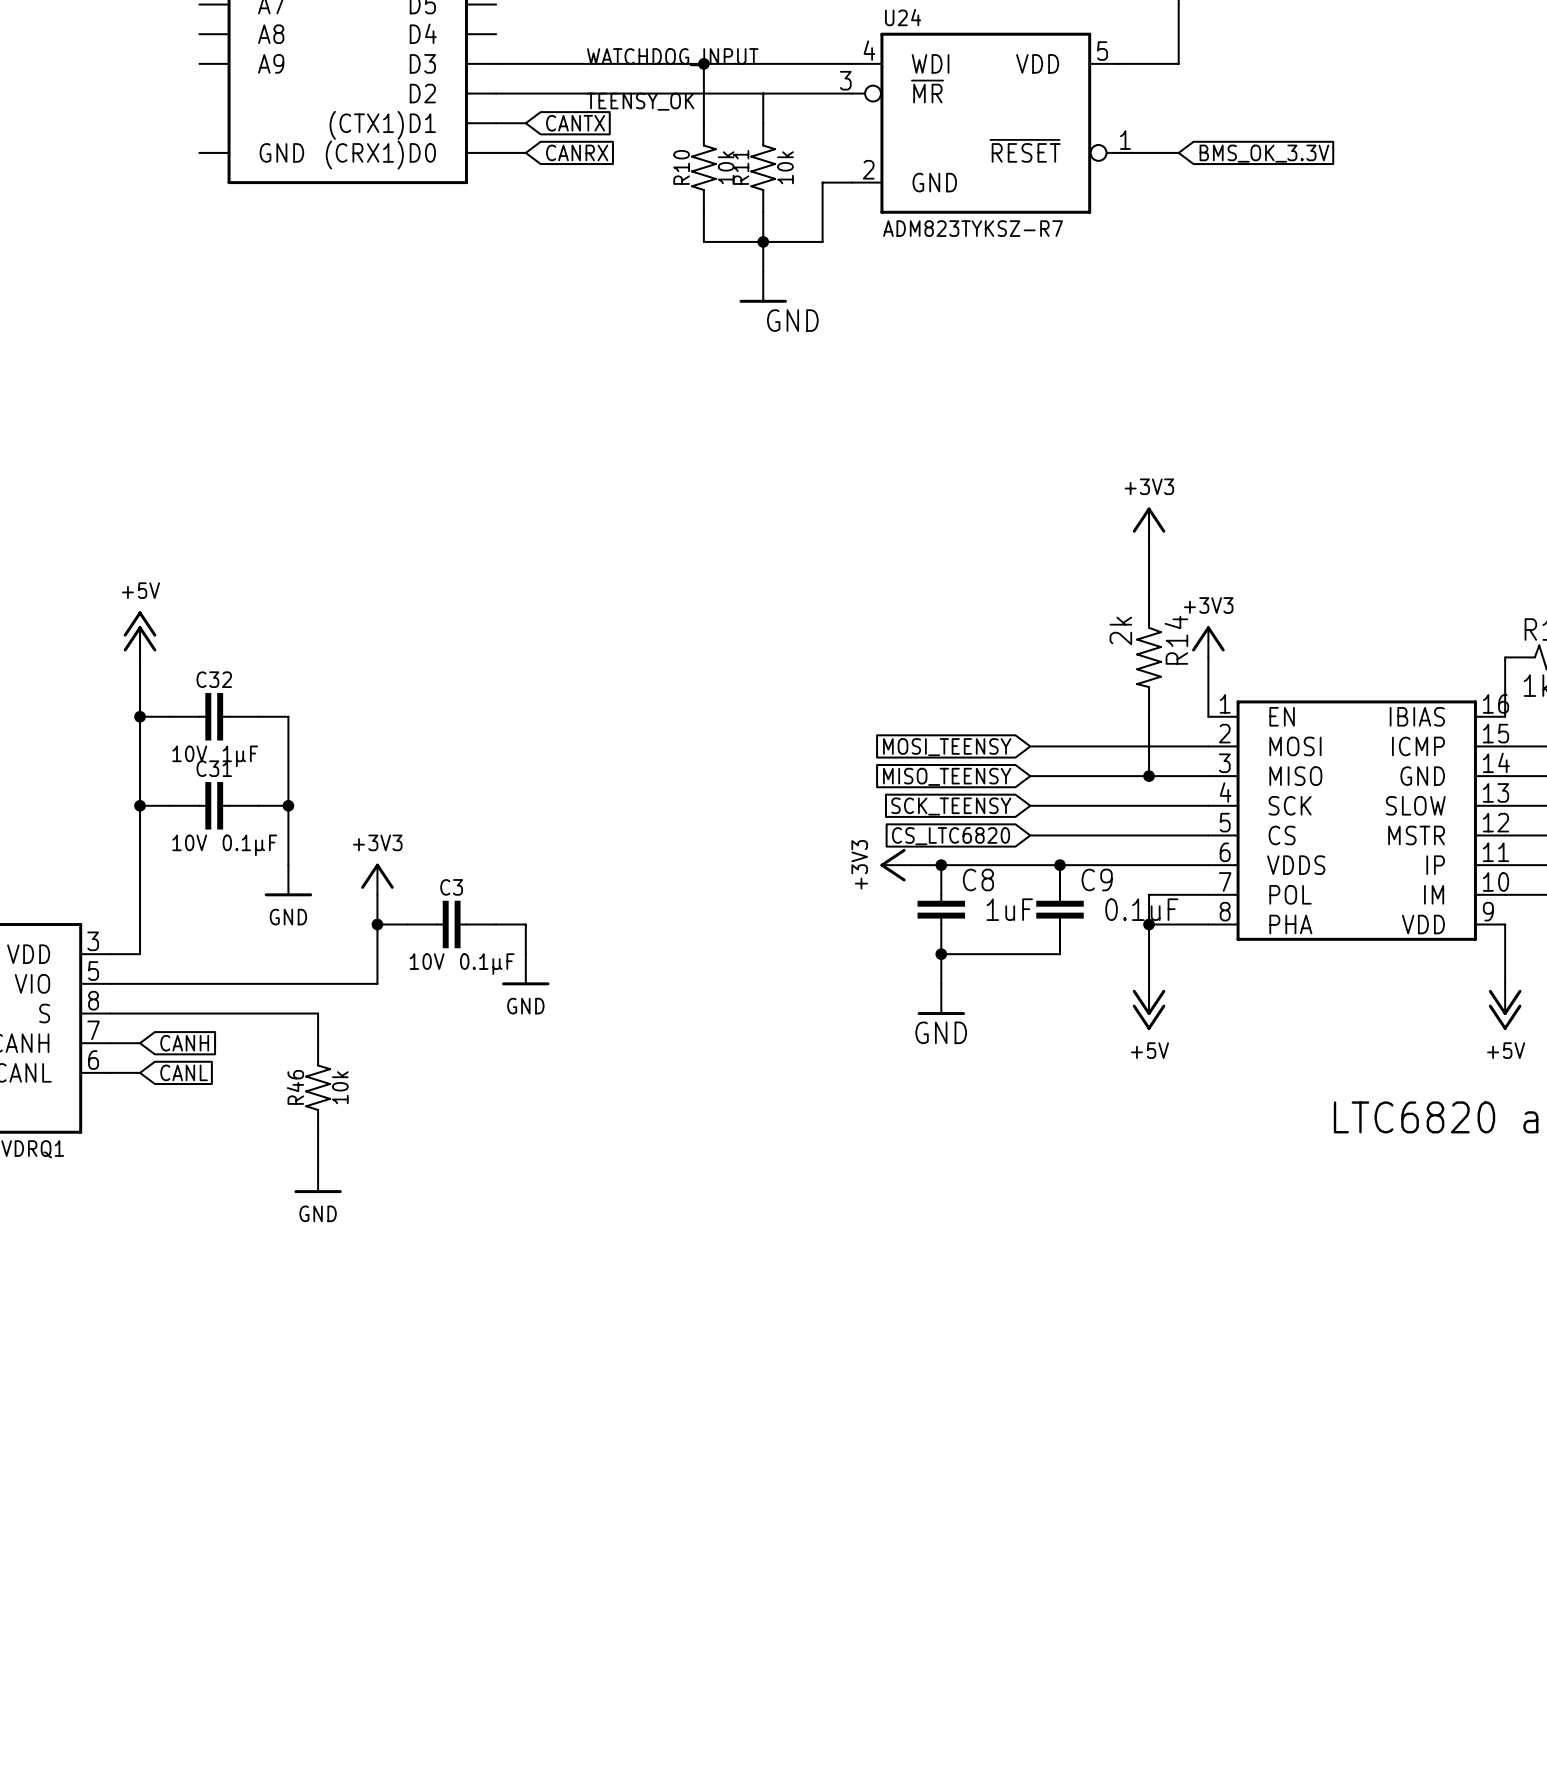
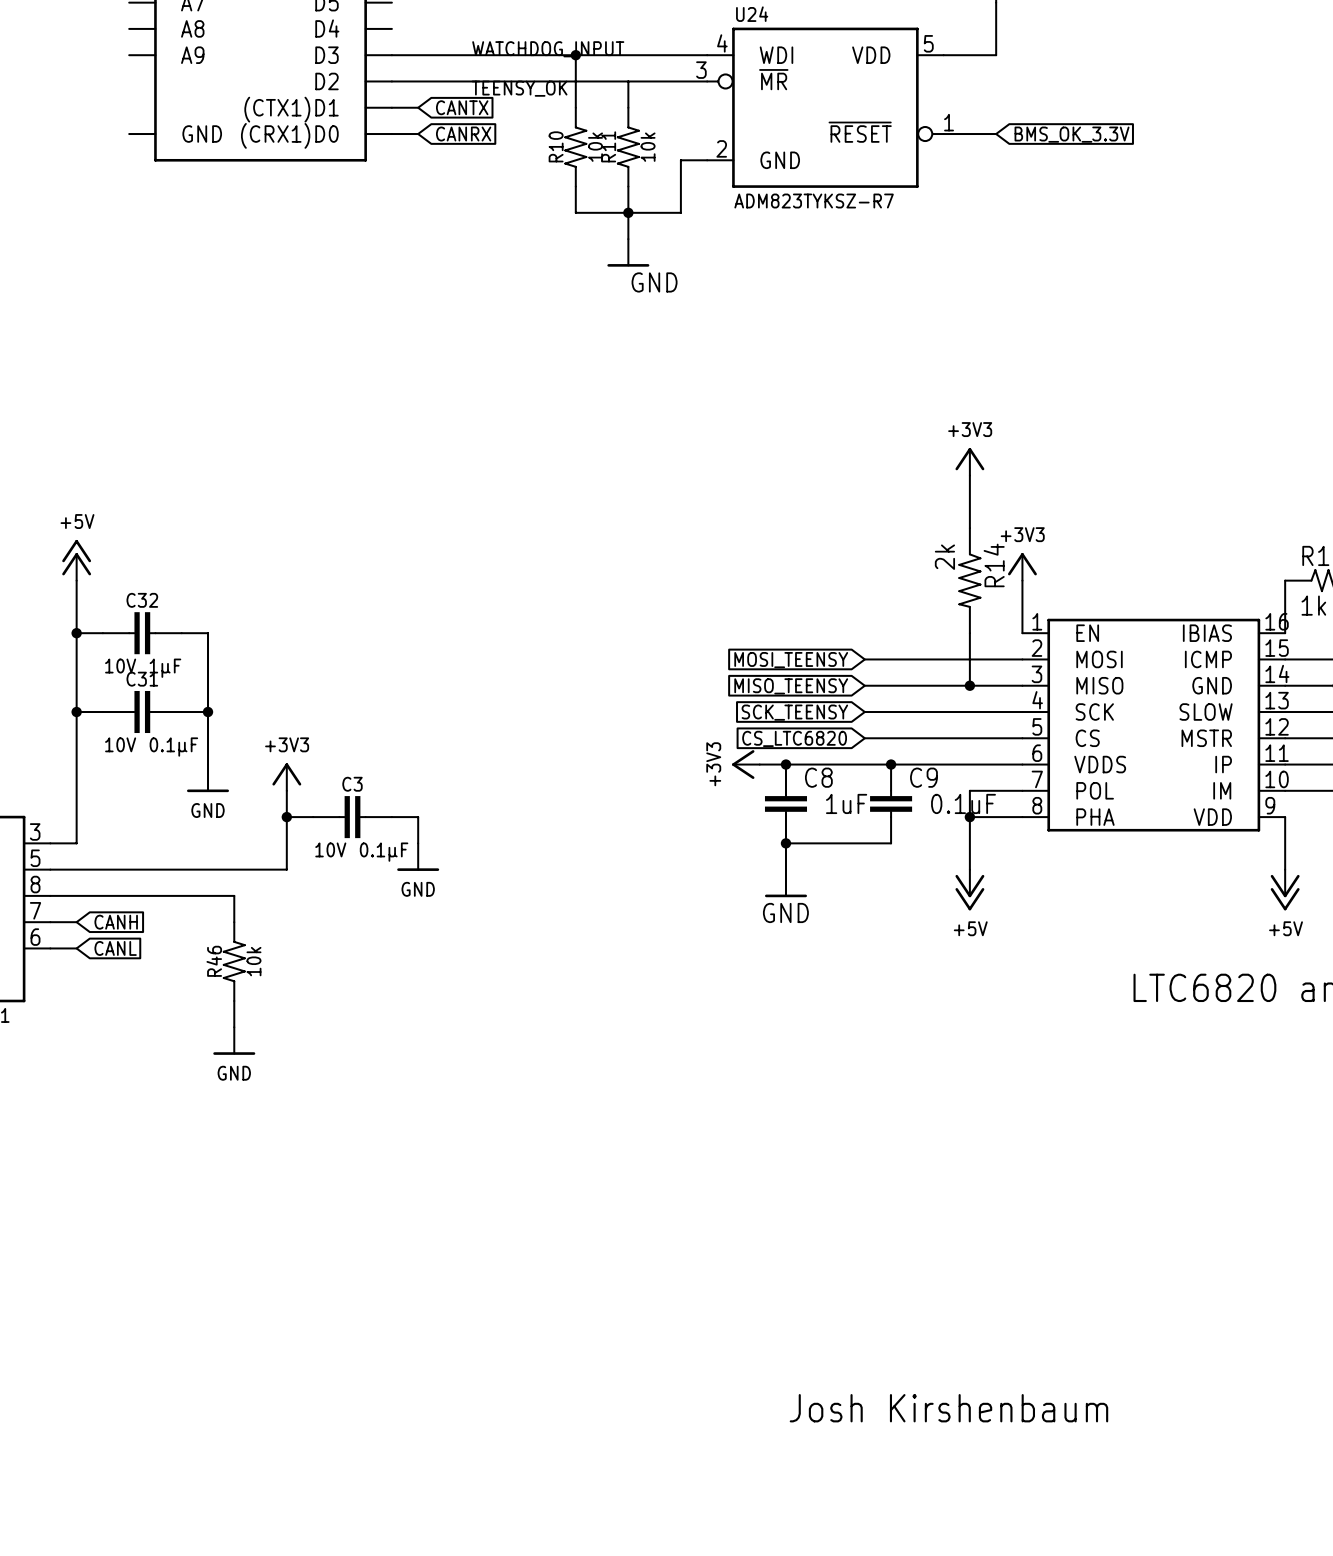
text: none -> Josh Kirshenbaum (948, 1408)

